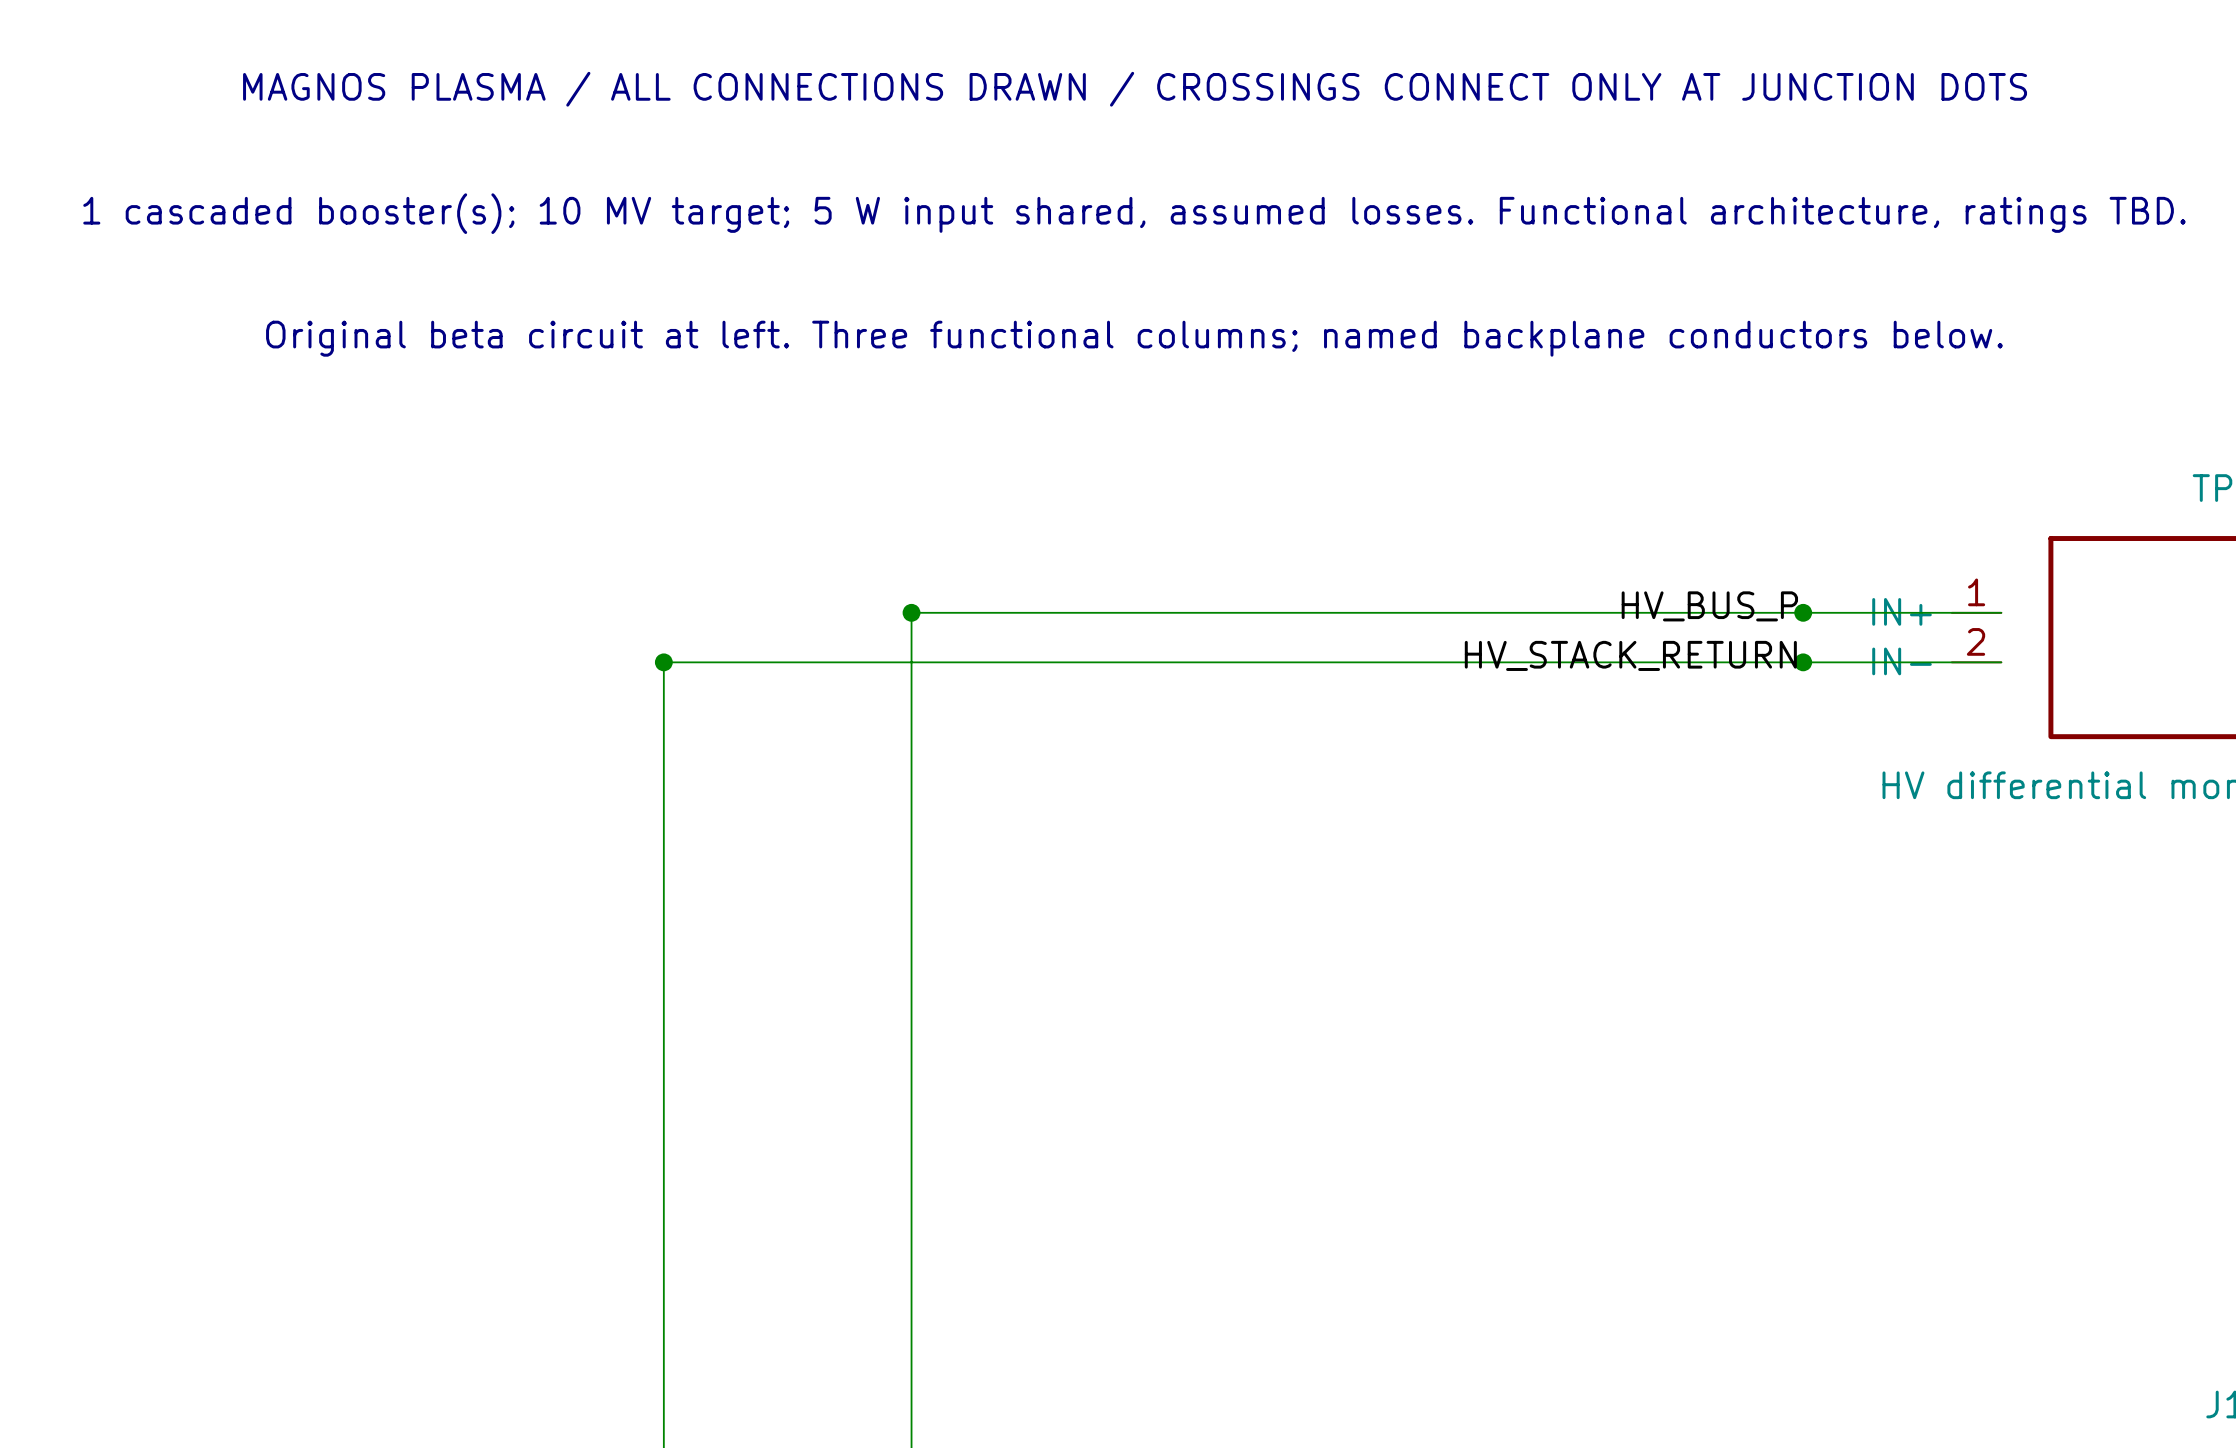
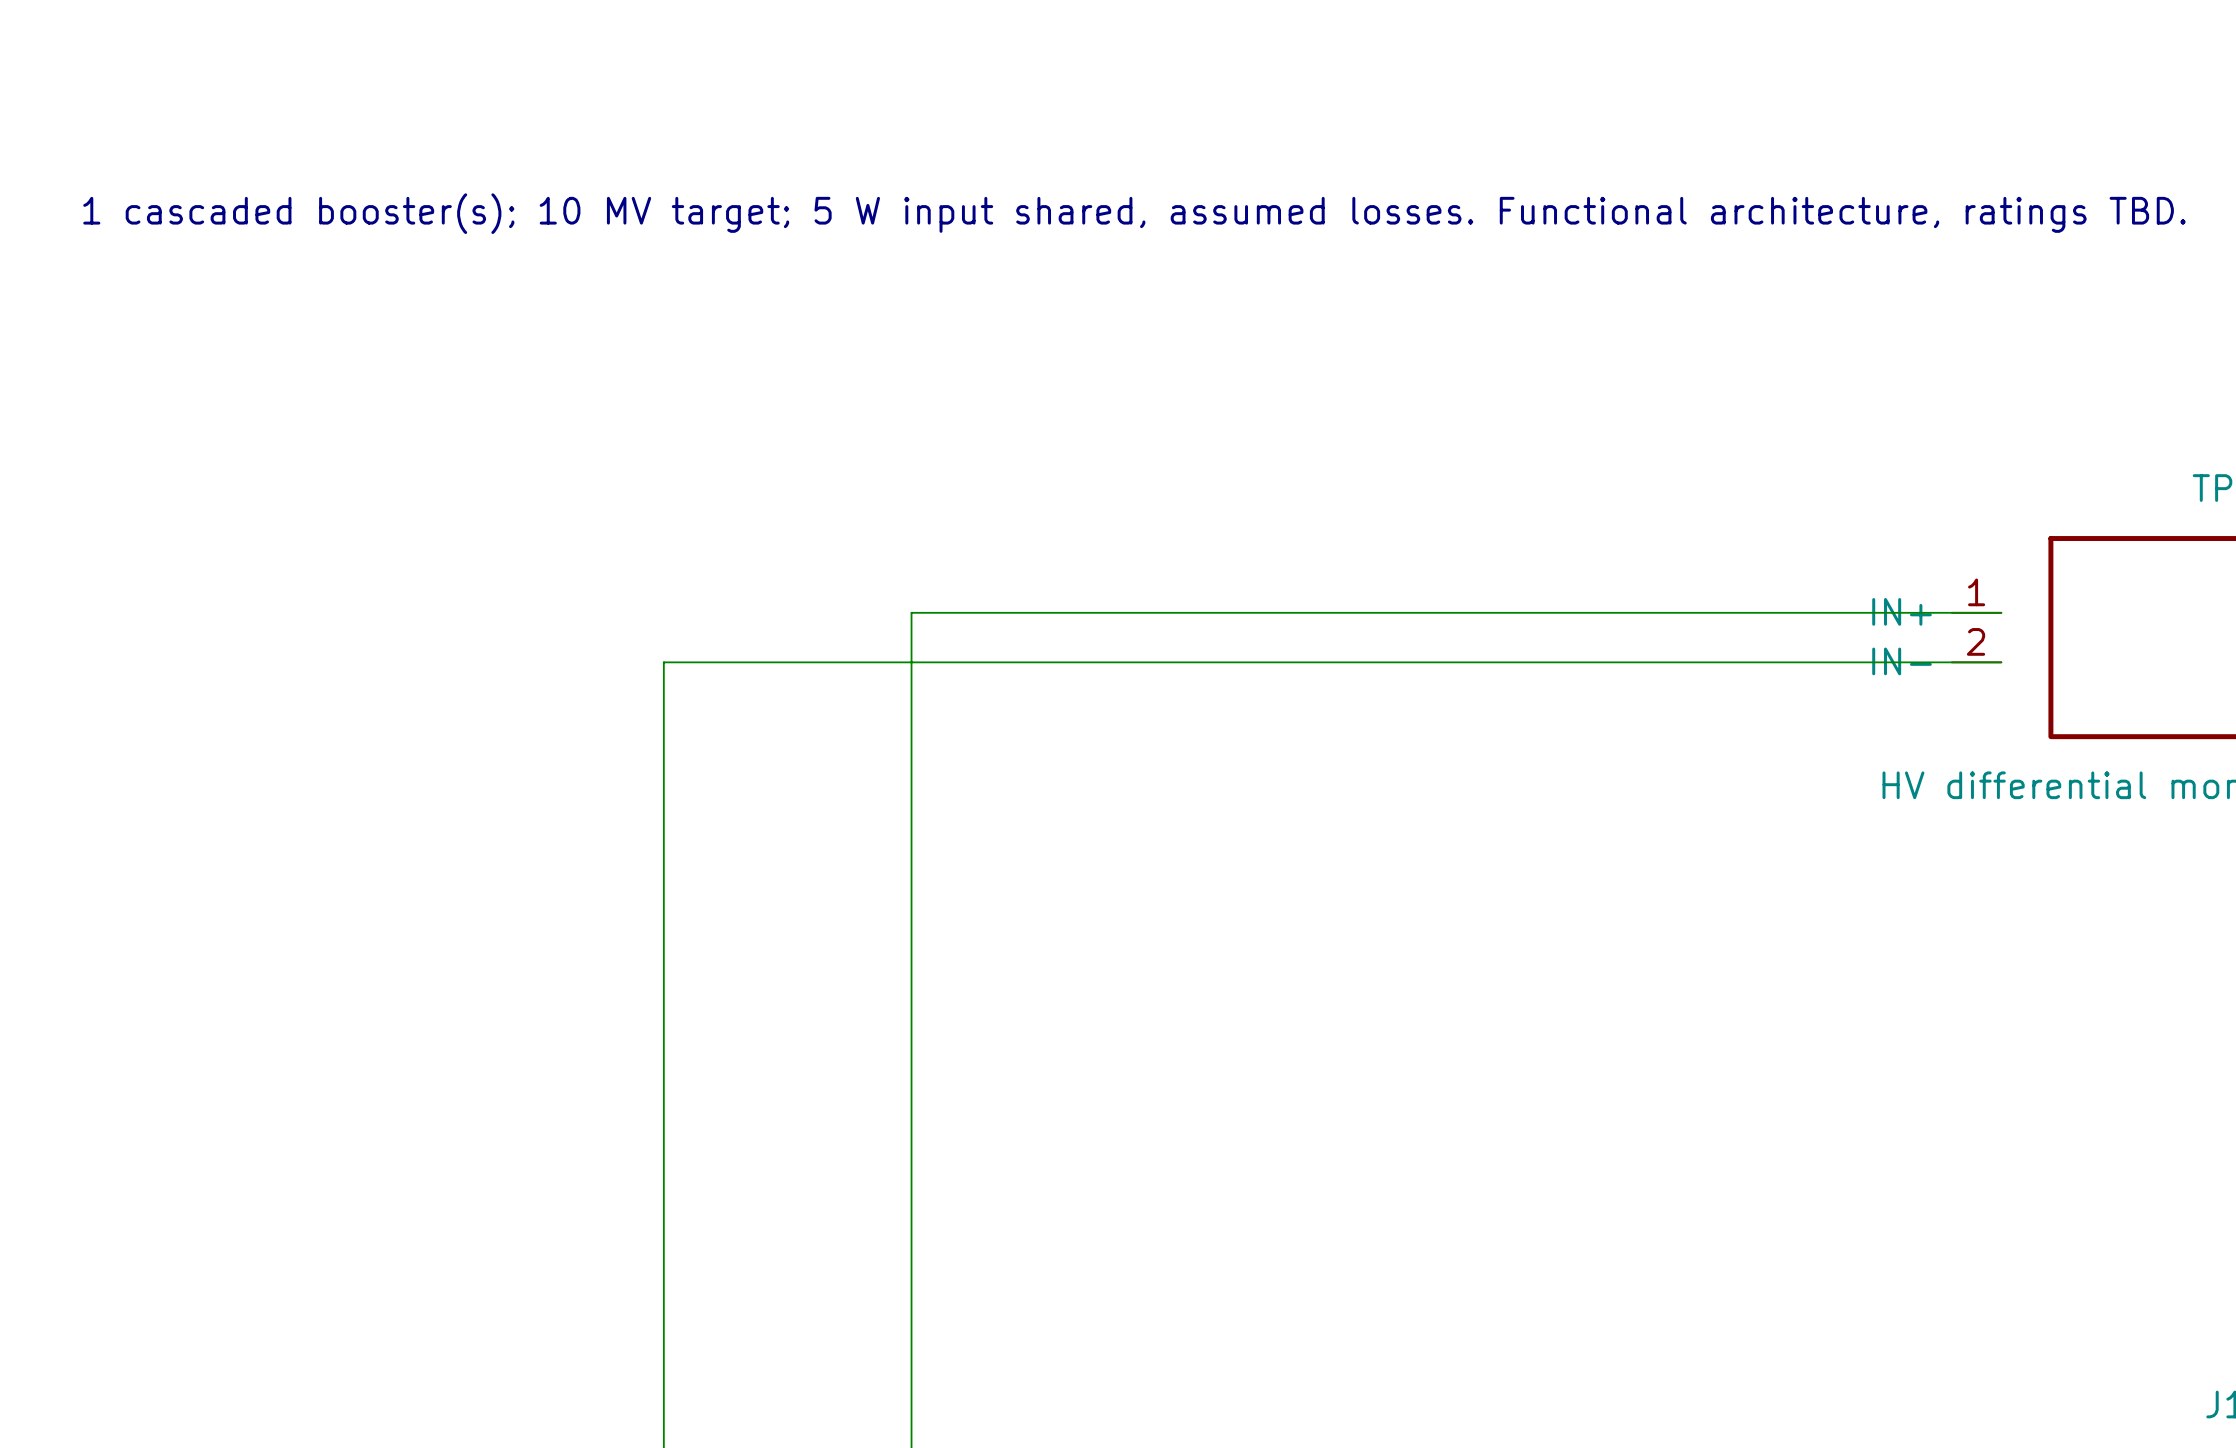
text: MAGNOS PLASMA / ALL CONNECTIONS DRAWN / CROSSINGS CONNECT ONLY AT JUNCTION DOTS (1135, 89) -> none
text: Original beta circuit at left. Three functional columns; named backplane conductors below. (1134, 338) -> none
label: HV_BUS_P (1709, 606) -> none
junction: (911, 612) -> none
junction: (1803, 612) -> none
label: HV_STACK_RETURN (1630, 655) -> none
junction: (663, 662) -> none
junction: (1803, 662) -> none

